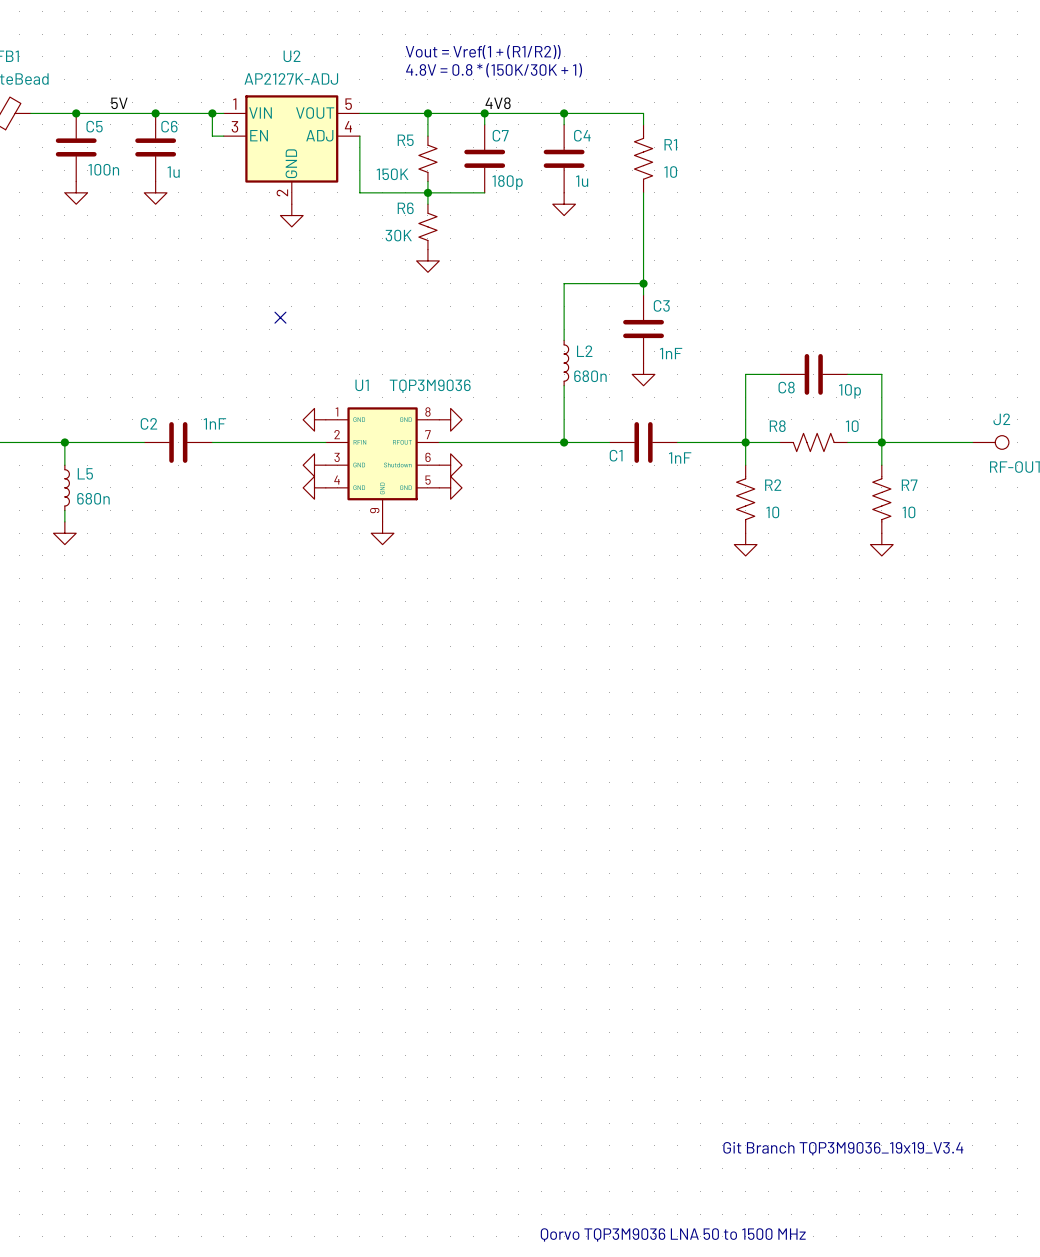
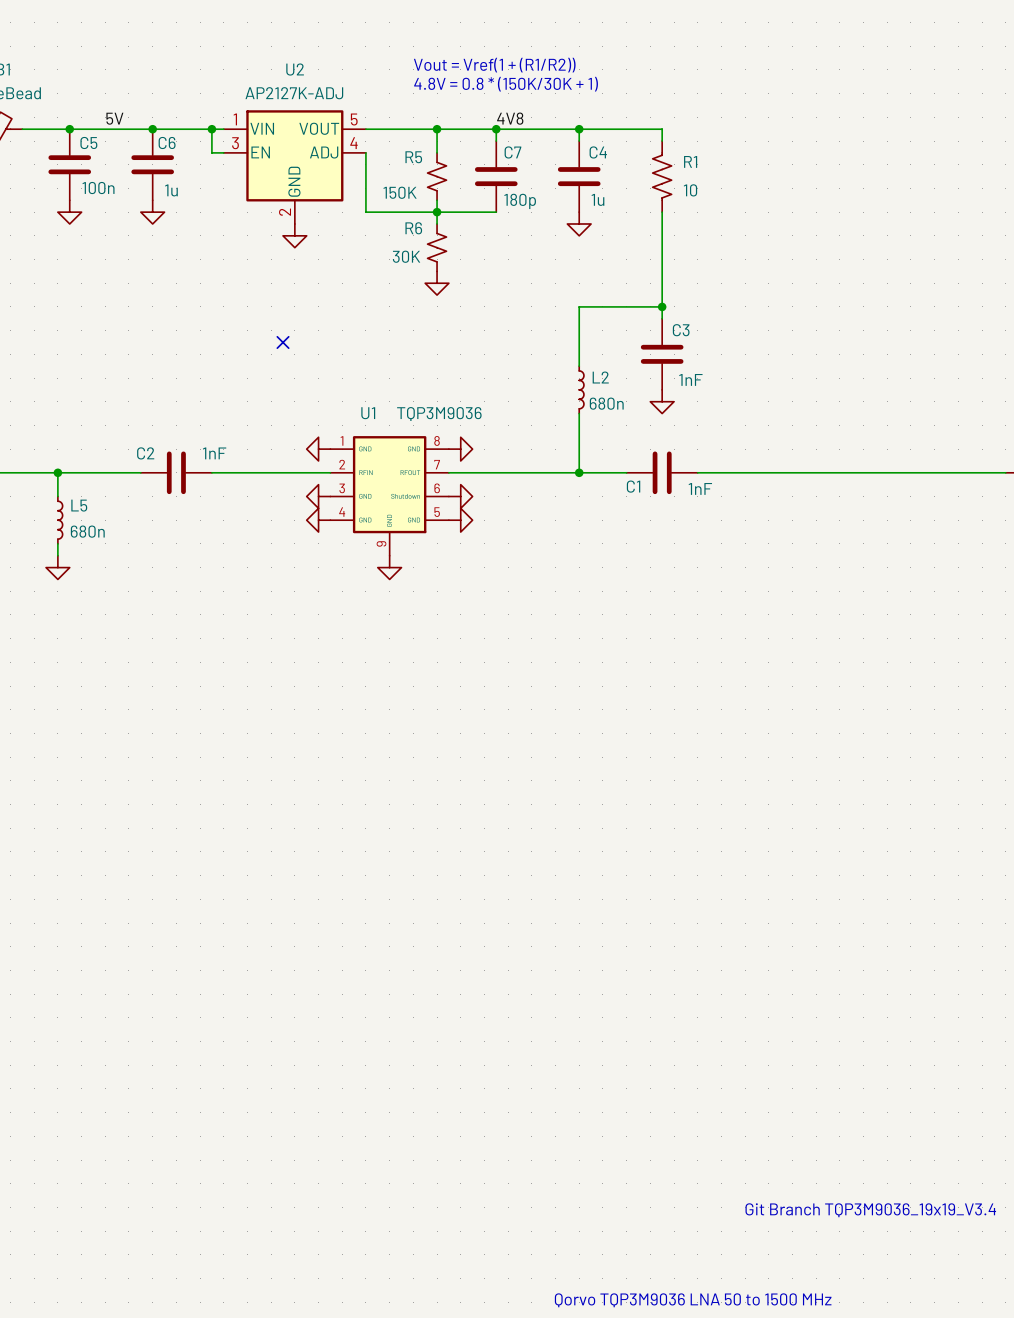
wire: (779, 374) (745, 374) (745, 465) -> none
C8: 10p (813, 374) -> none
wire: (847, 374) (881, 374) (881, 465) -> none
junction: (745, 442) -> none
R8: 10 (813, 442) -> none
junction: (881, 442) -> none
R2: 10 (745, 499) -> none
R7: 10 (881, 499) -> none
power symbol: (745, 544) -> none
power symbol: (881, 544) -> none

